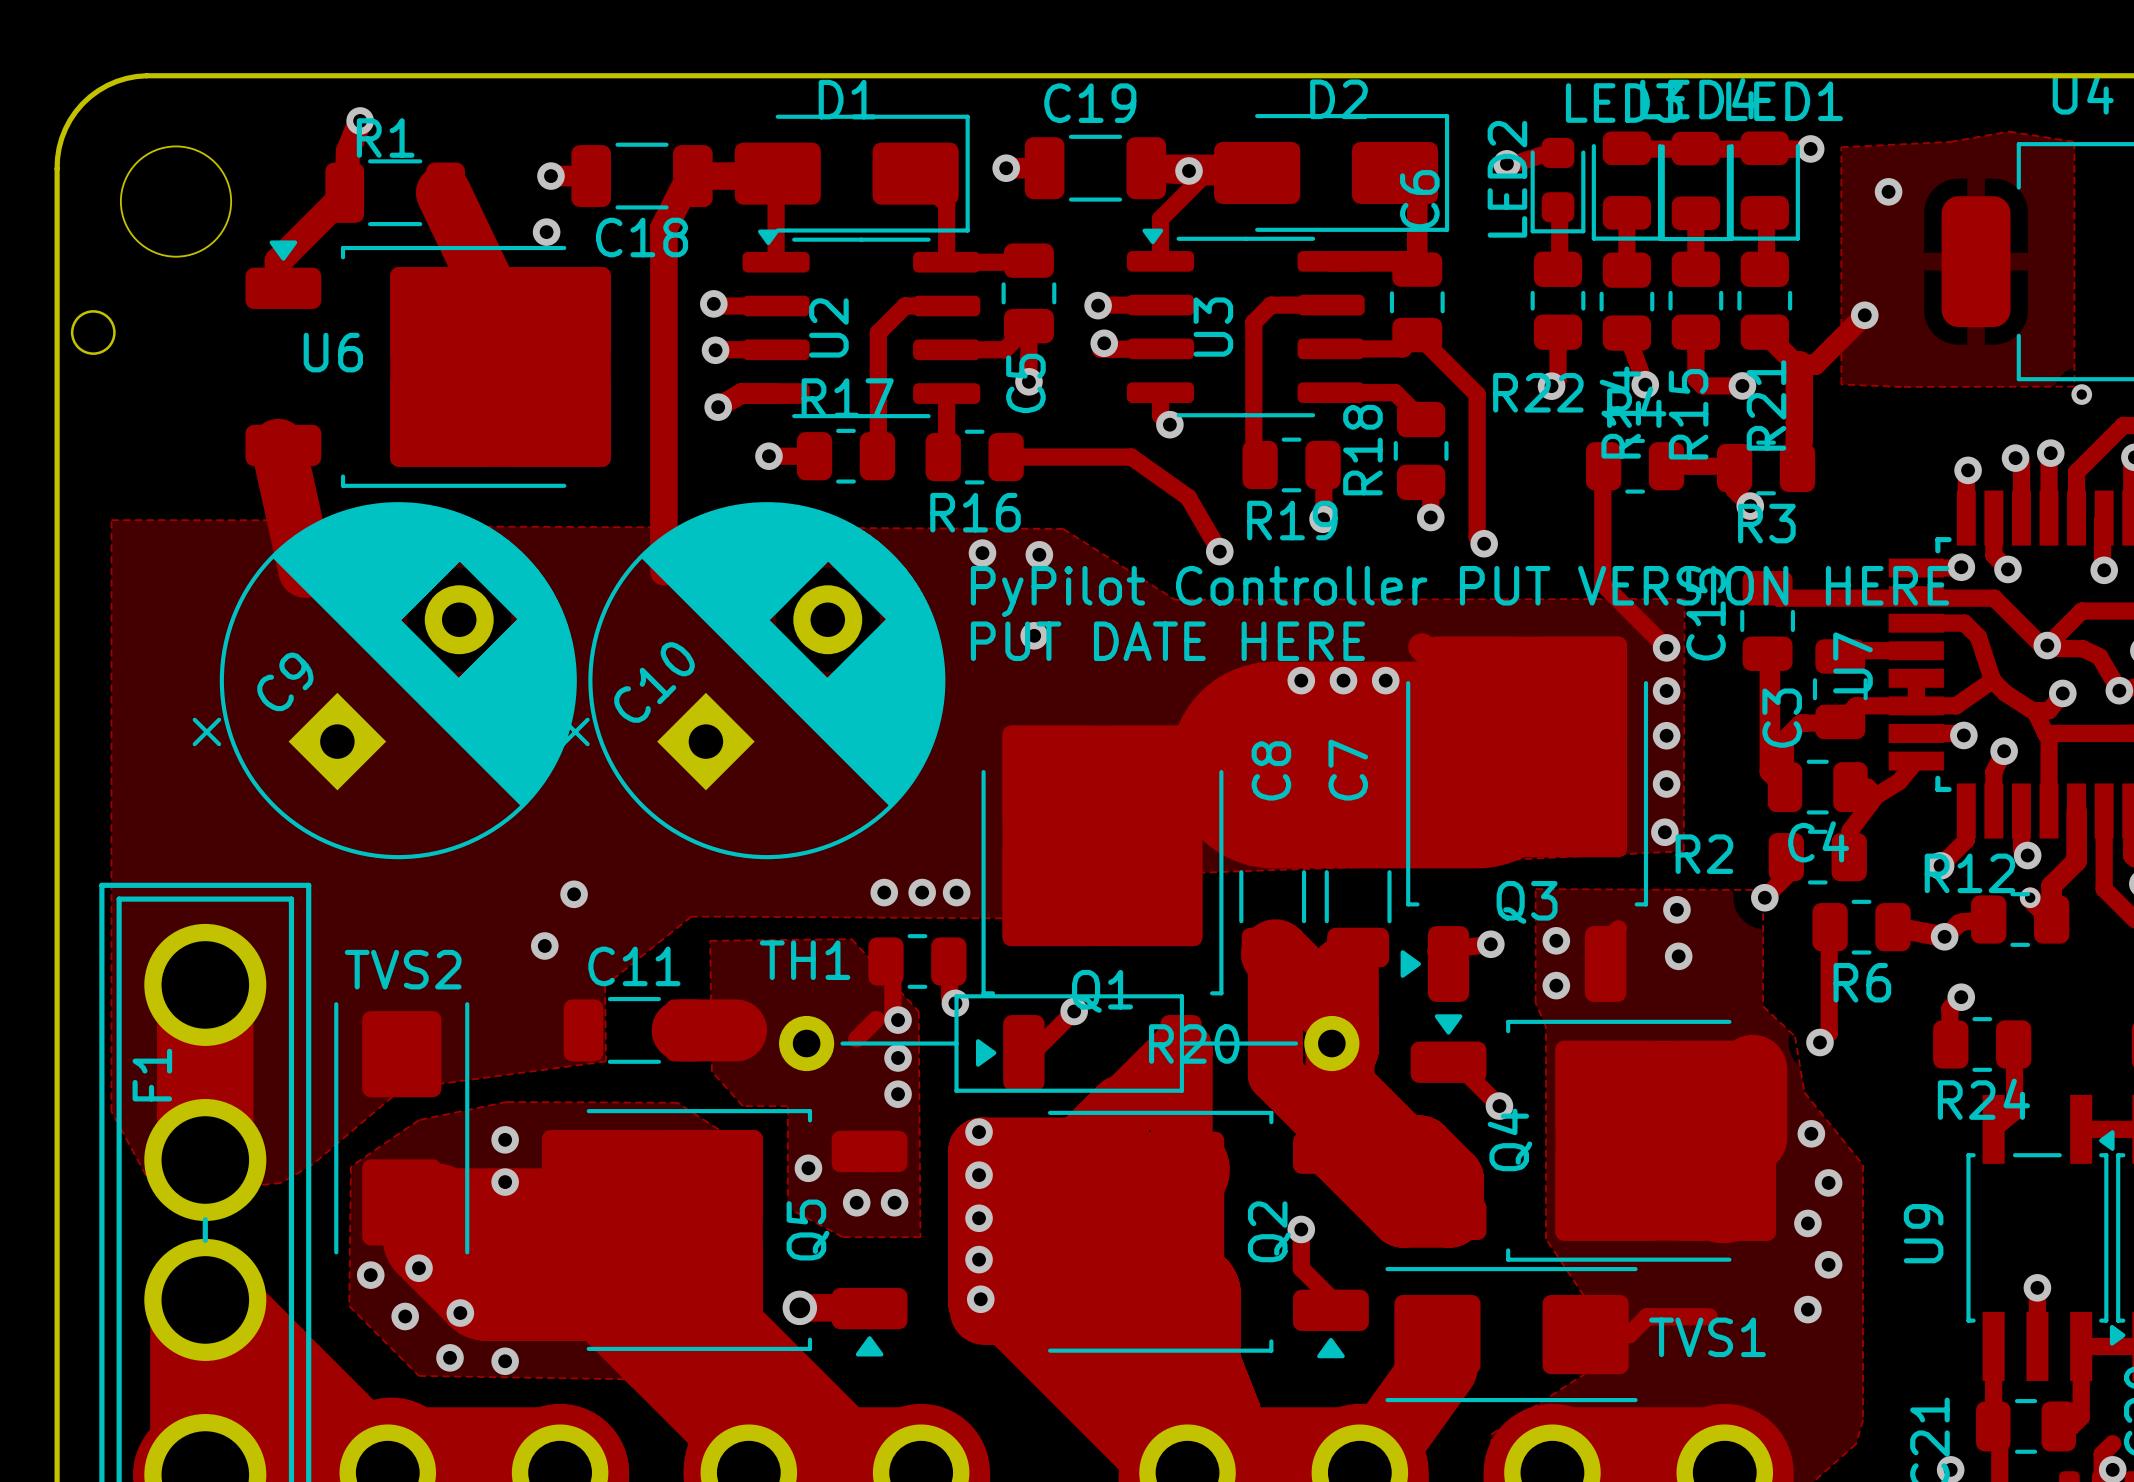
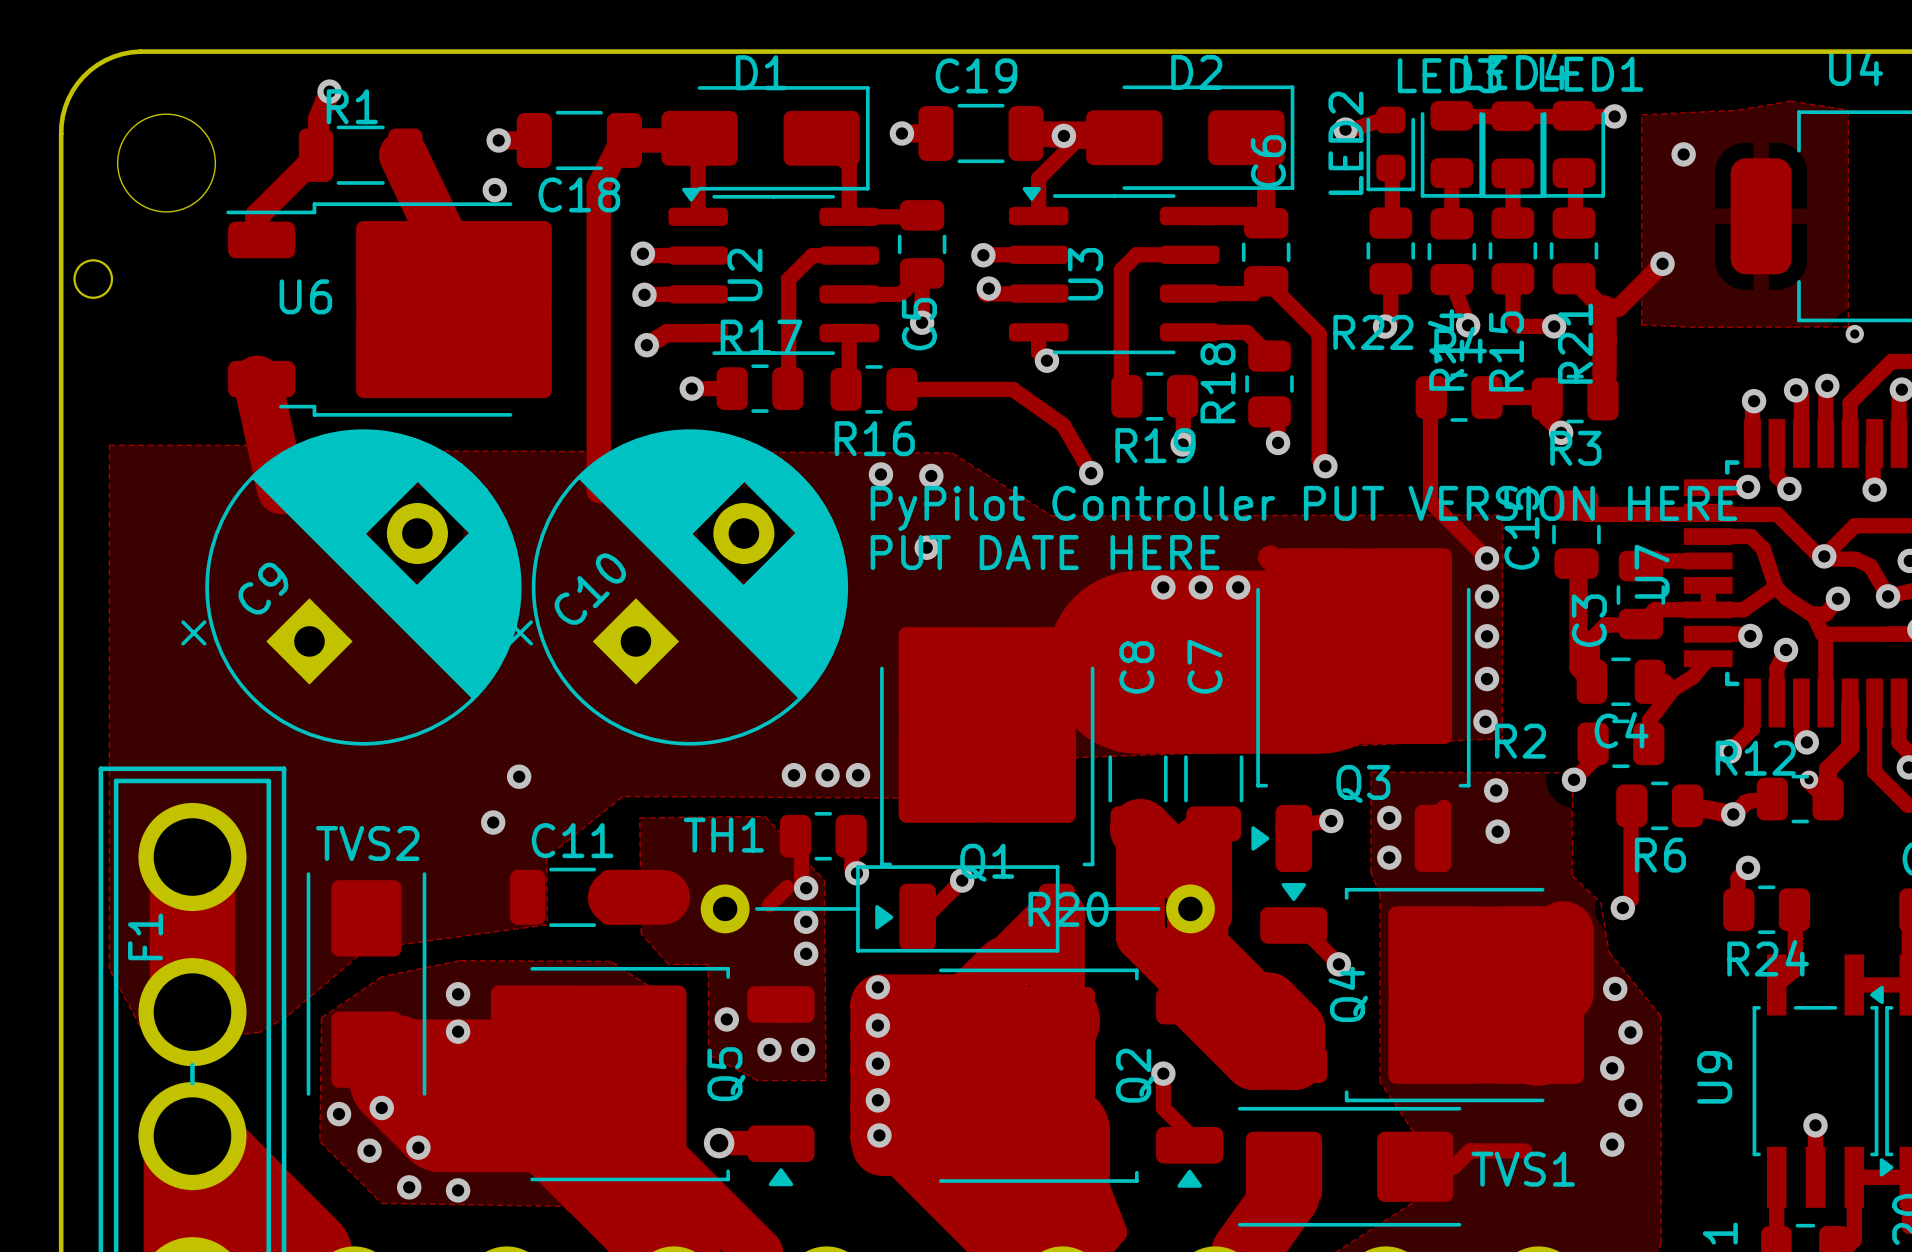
U6 footprint: [245, 240, 611, 488] -> [226, 202, 552, 417]

